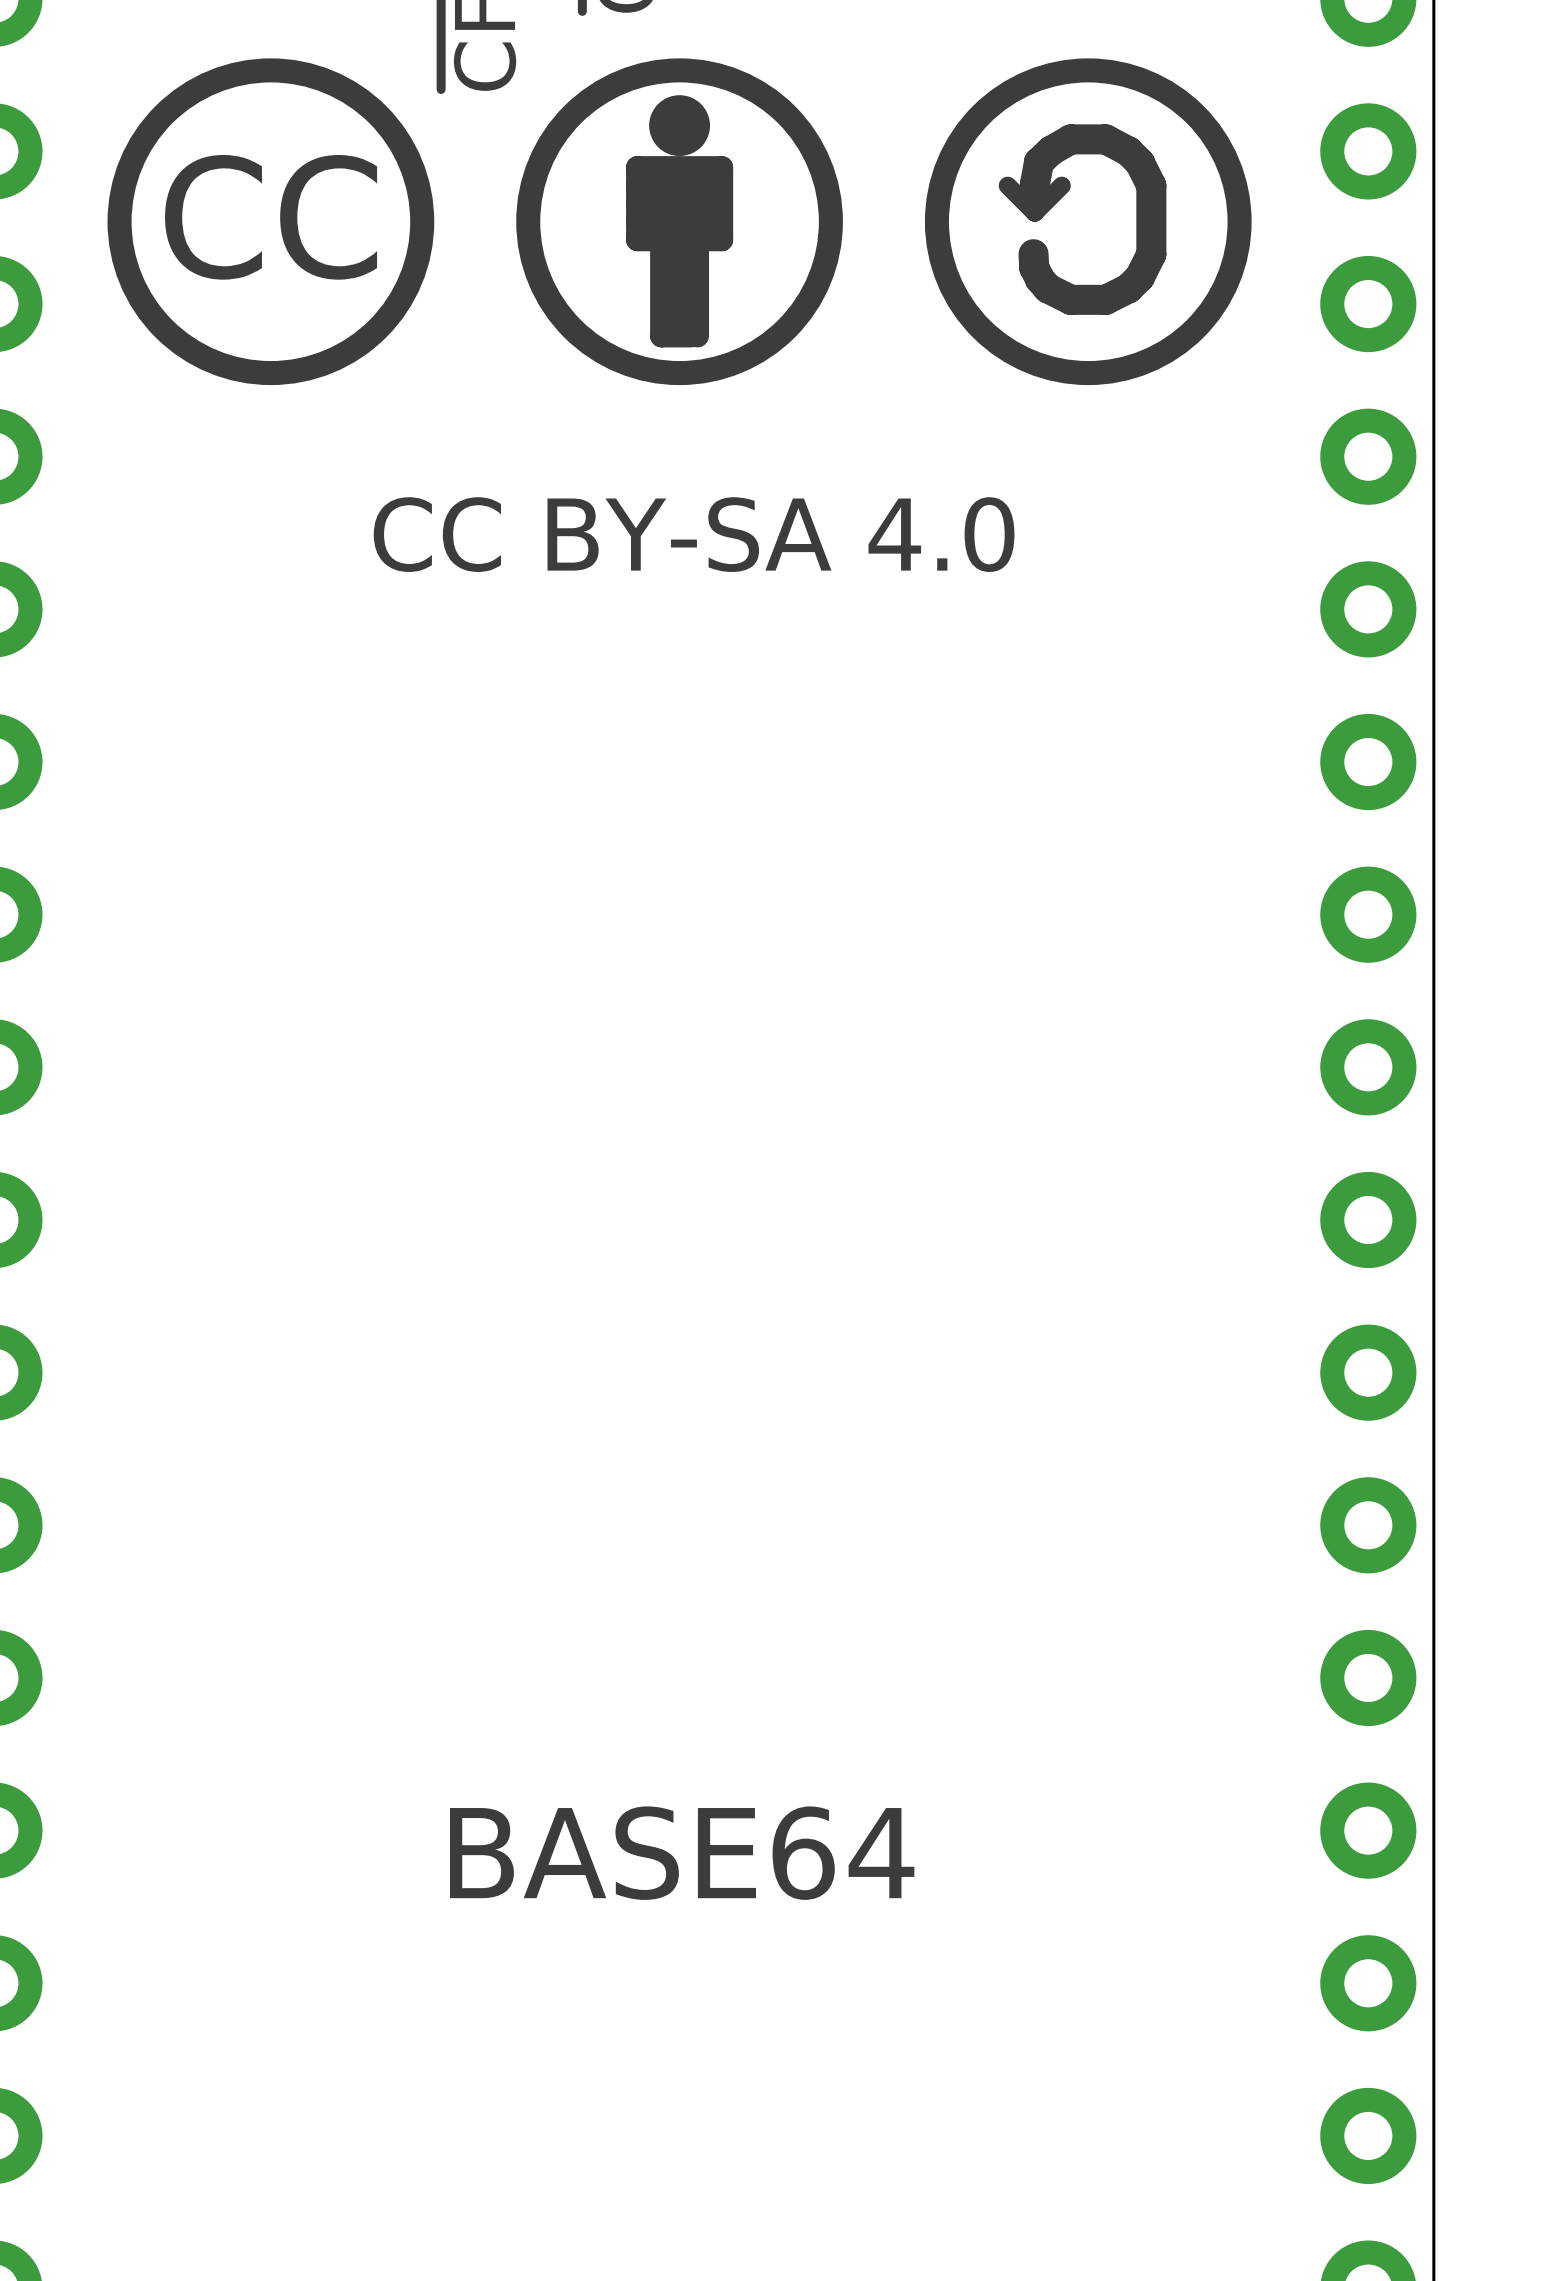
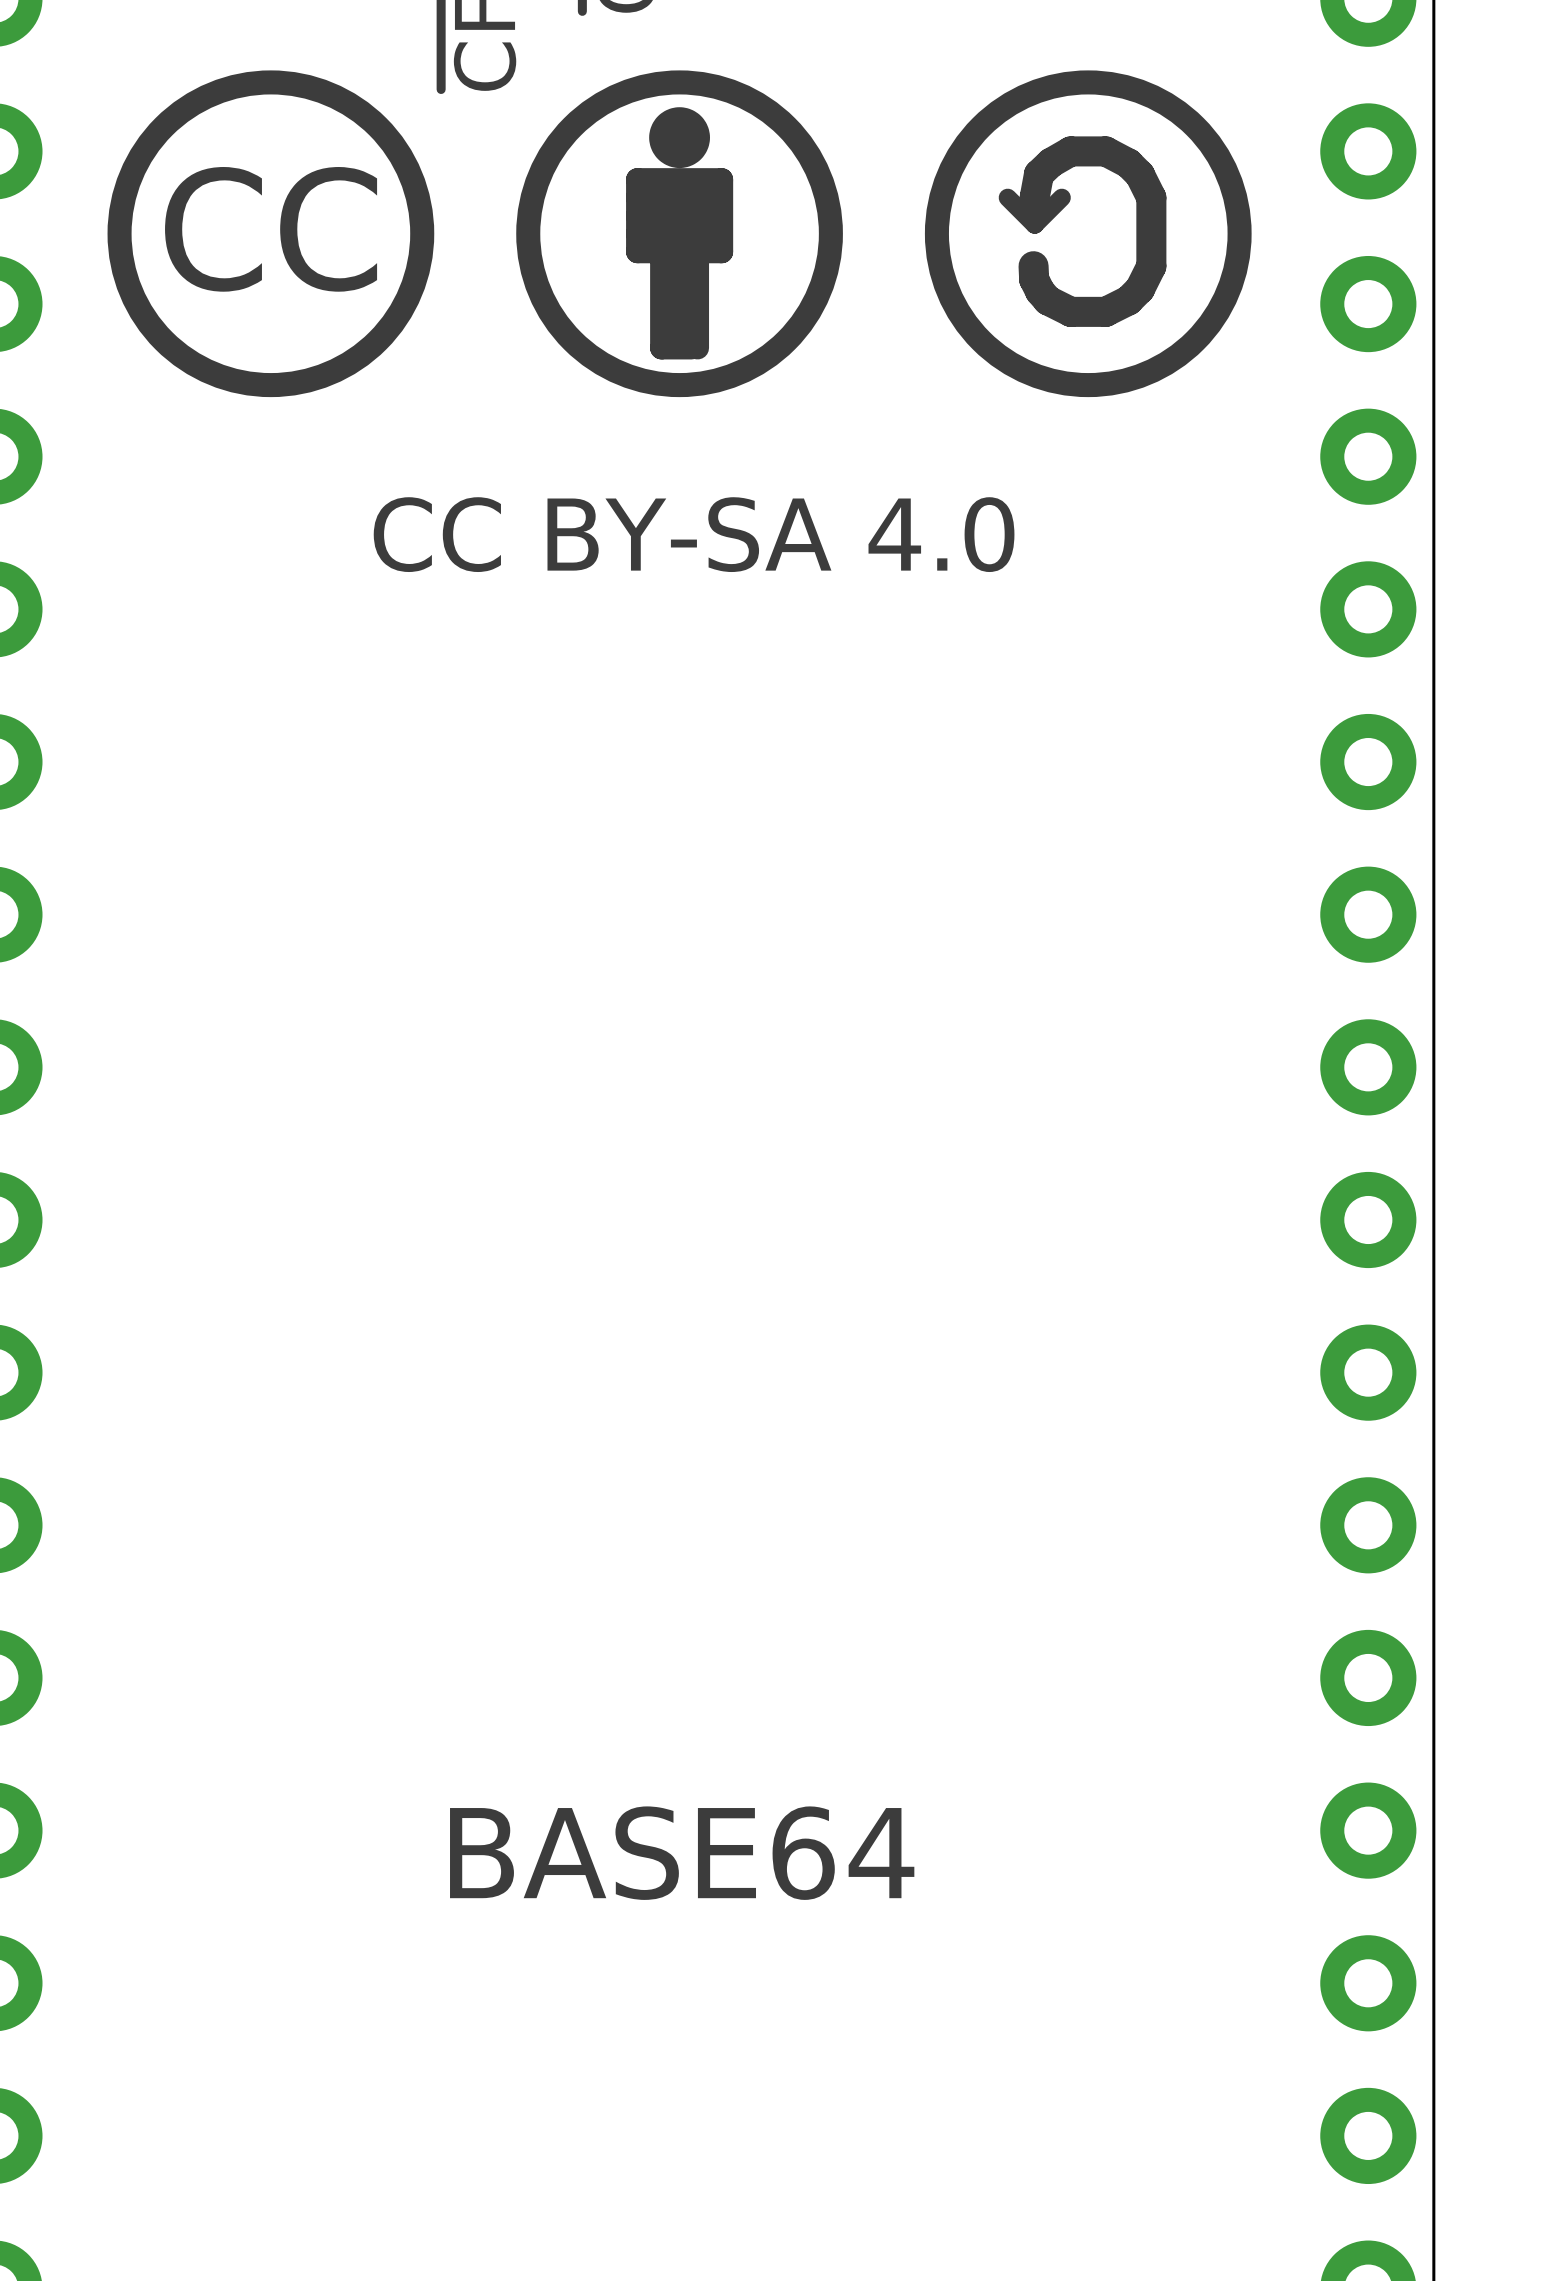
drawing position: (270, 221) -> (270, 233)
drawing position: (679, 221) -> (679, 233)
drawing position: (1088, 221) -> (1088, 233)

